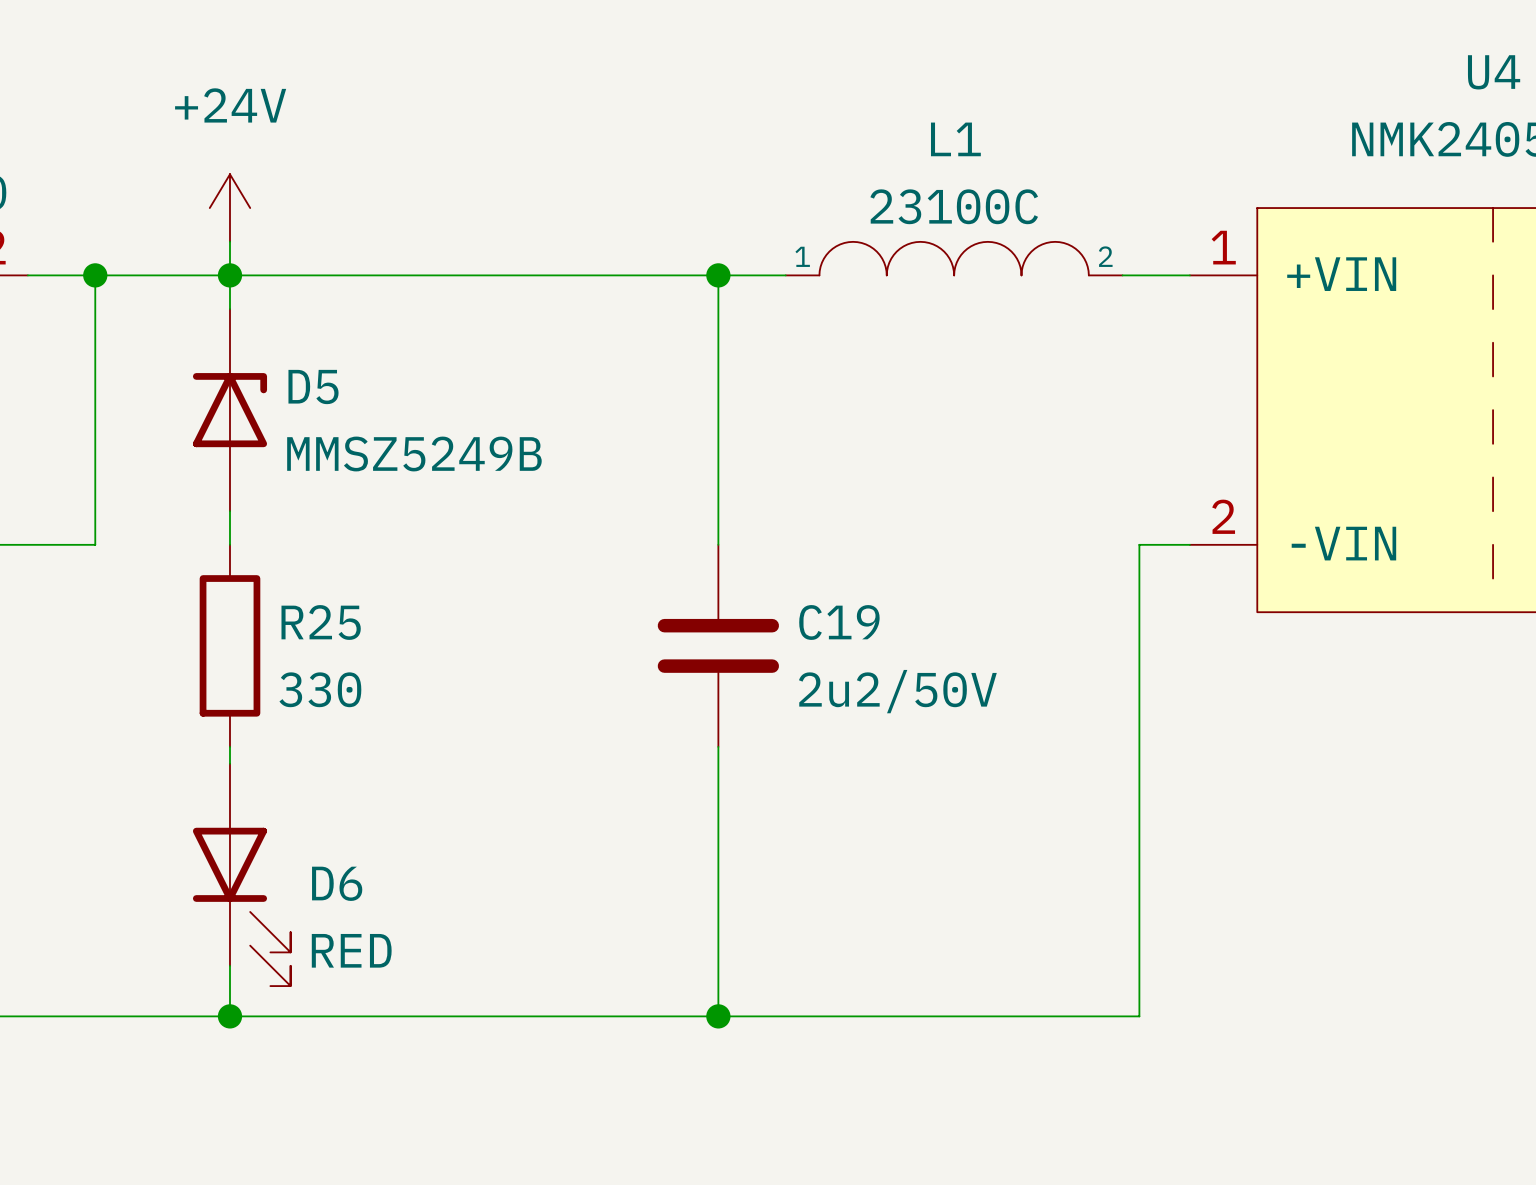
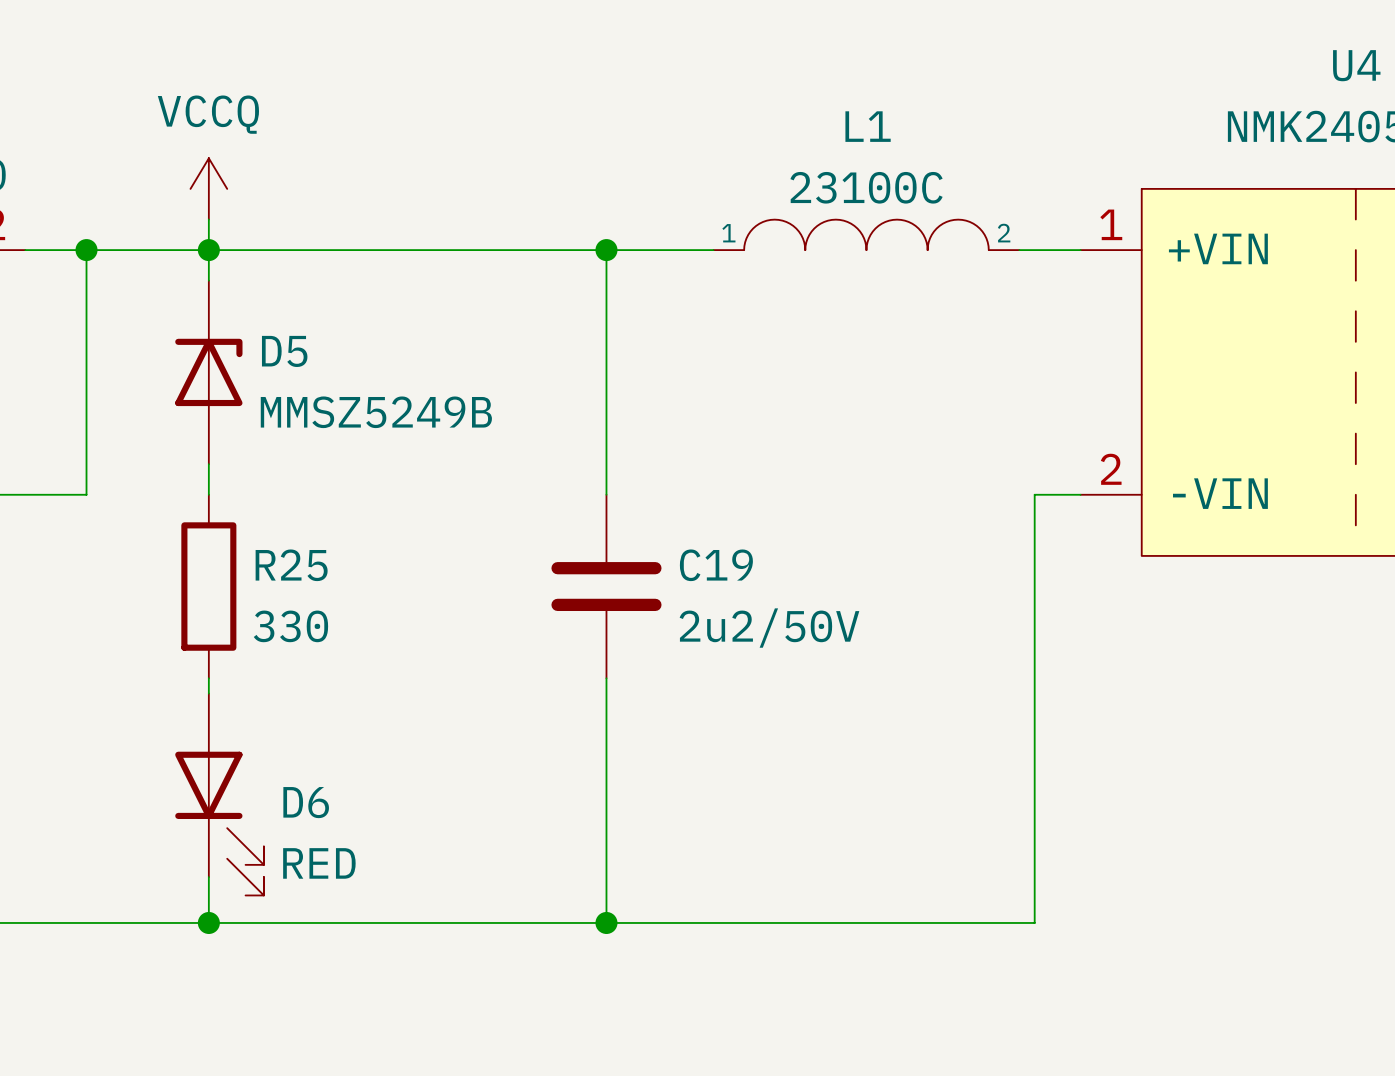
power symbol: +24V (229, 208) -> VCCQ (208, 188)
wire: (718, 275) (718, 544) -> (606, 250) (606, 494)
junction position: (718, 275) -> (606, 250)
C19 position: (718, 645) -> (606, 586)
wire: (718, 746) (718, 1016) -> (606, 678) (606, 922)
junction position: (718, 1016) -> (606, 922)

